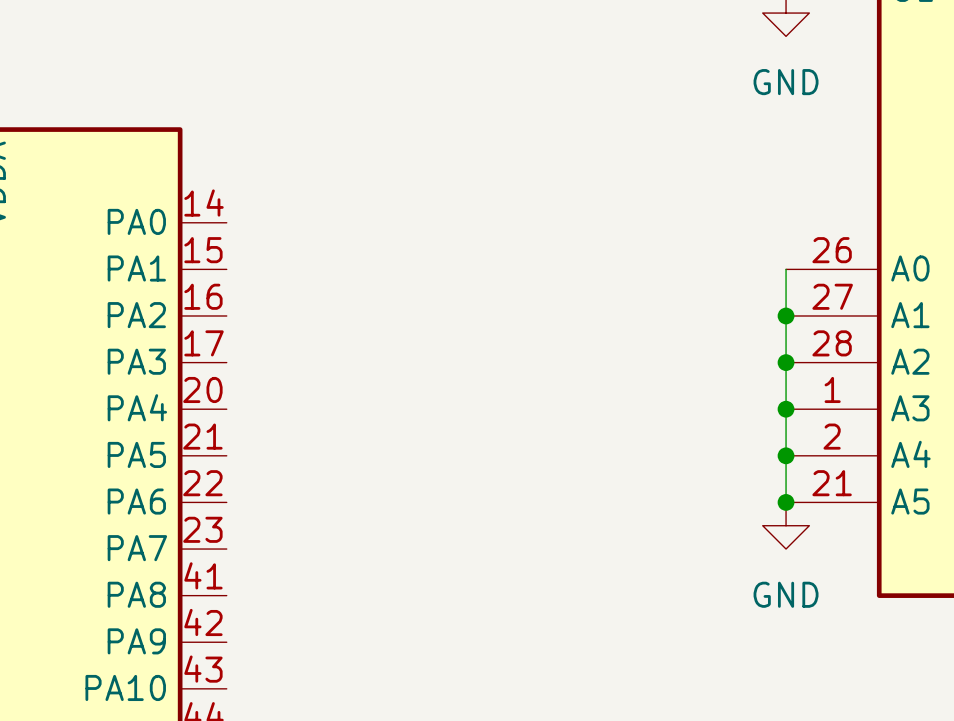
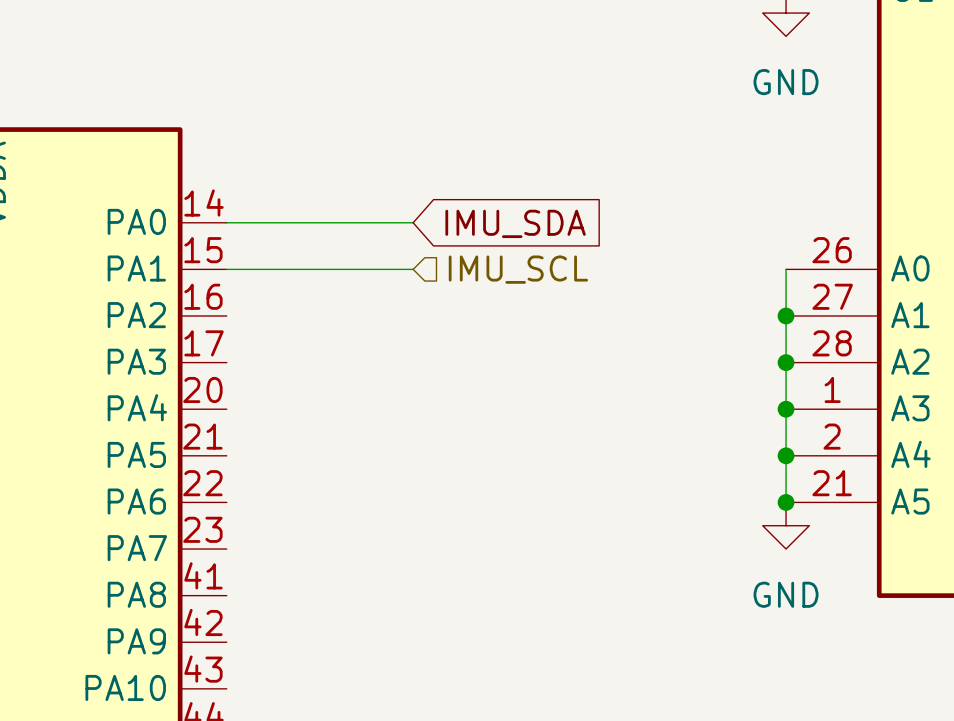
wire: none -> (226, 222) (413, 222)
global label: none -> IMU_SDA (515, 223)
wire: none -> (226, 269) (413, 269)
hierarchical label: none -> IMU_SCL (518, 269)

